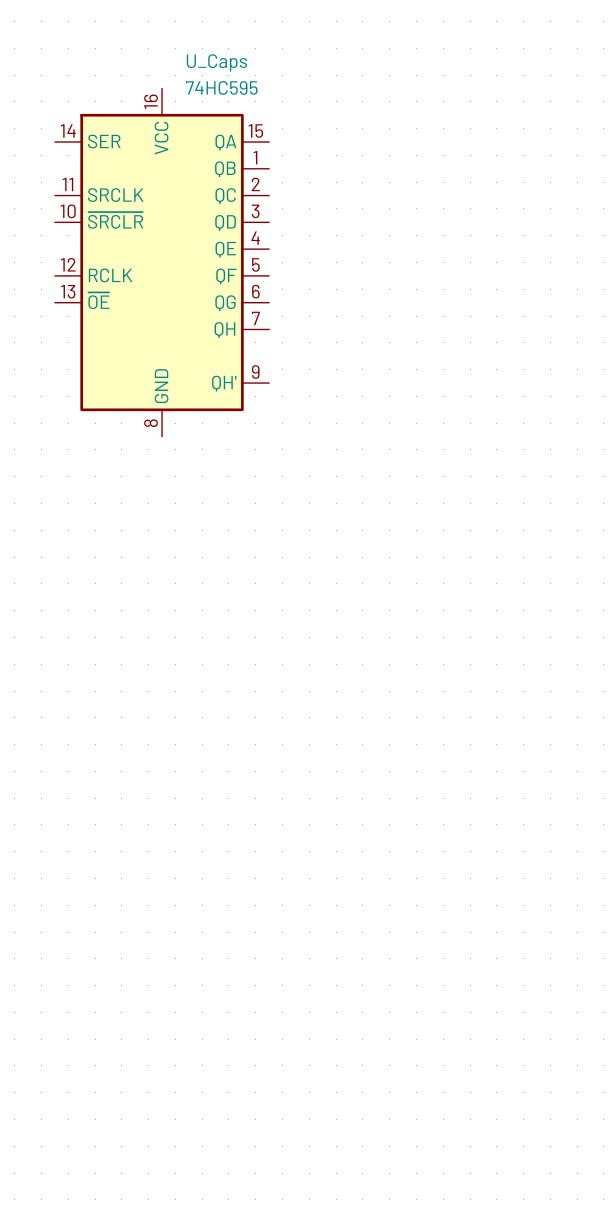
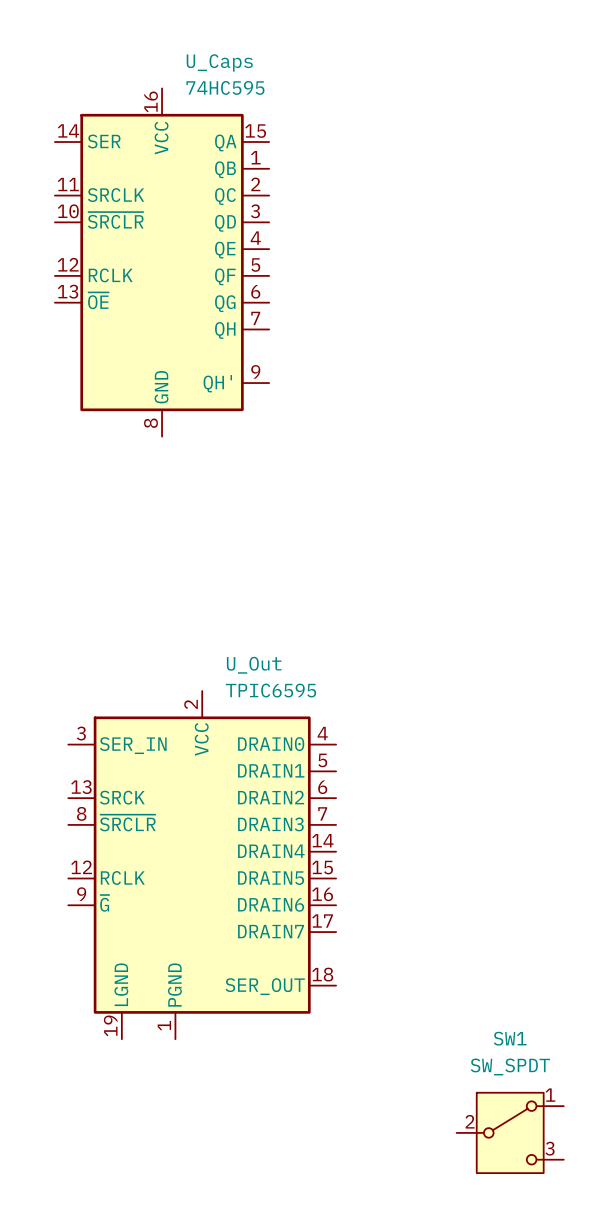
U_Out: none -> TPIC6595 (202, 865)
SW1: none -> SW_SPDT (510, 1132)

